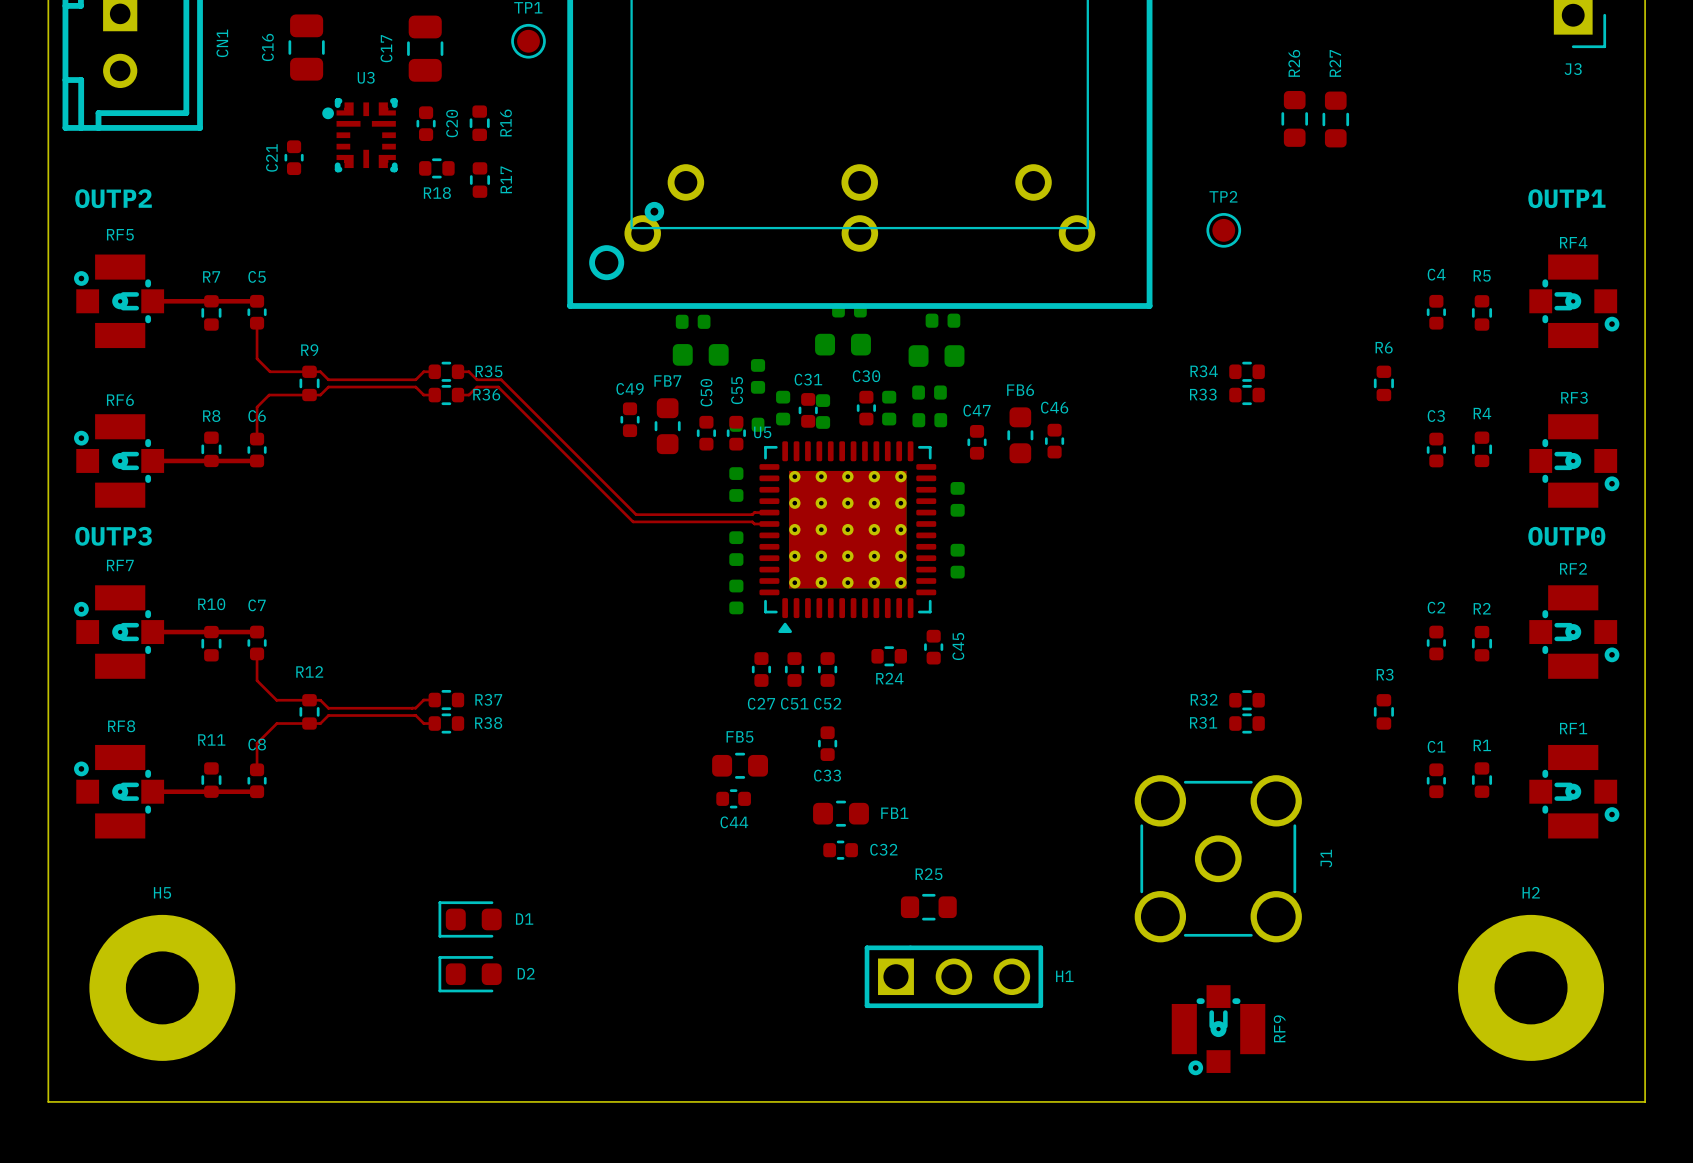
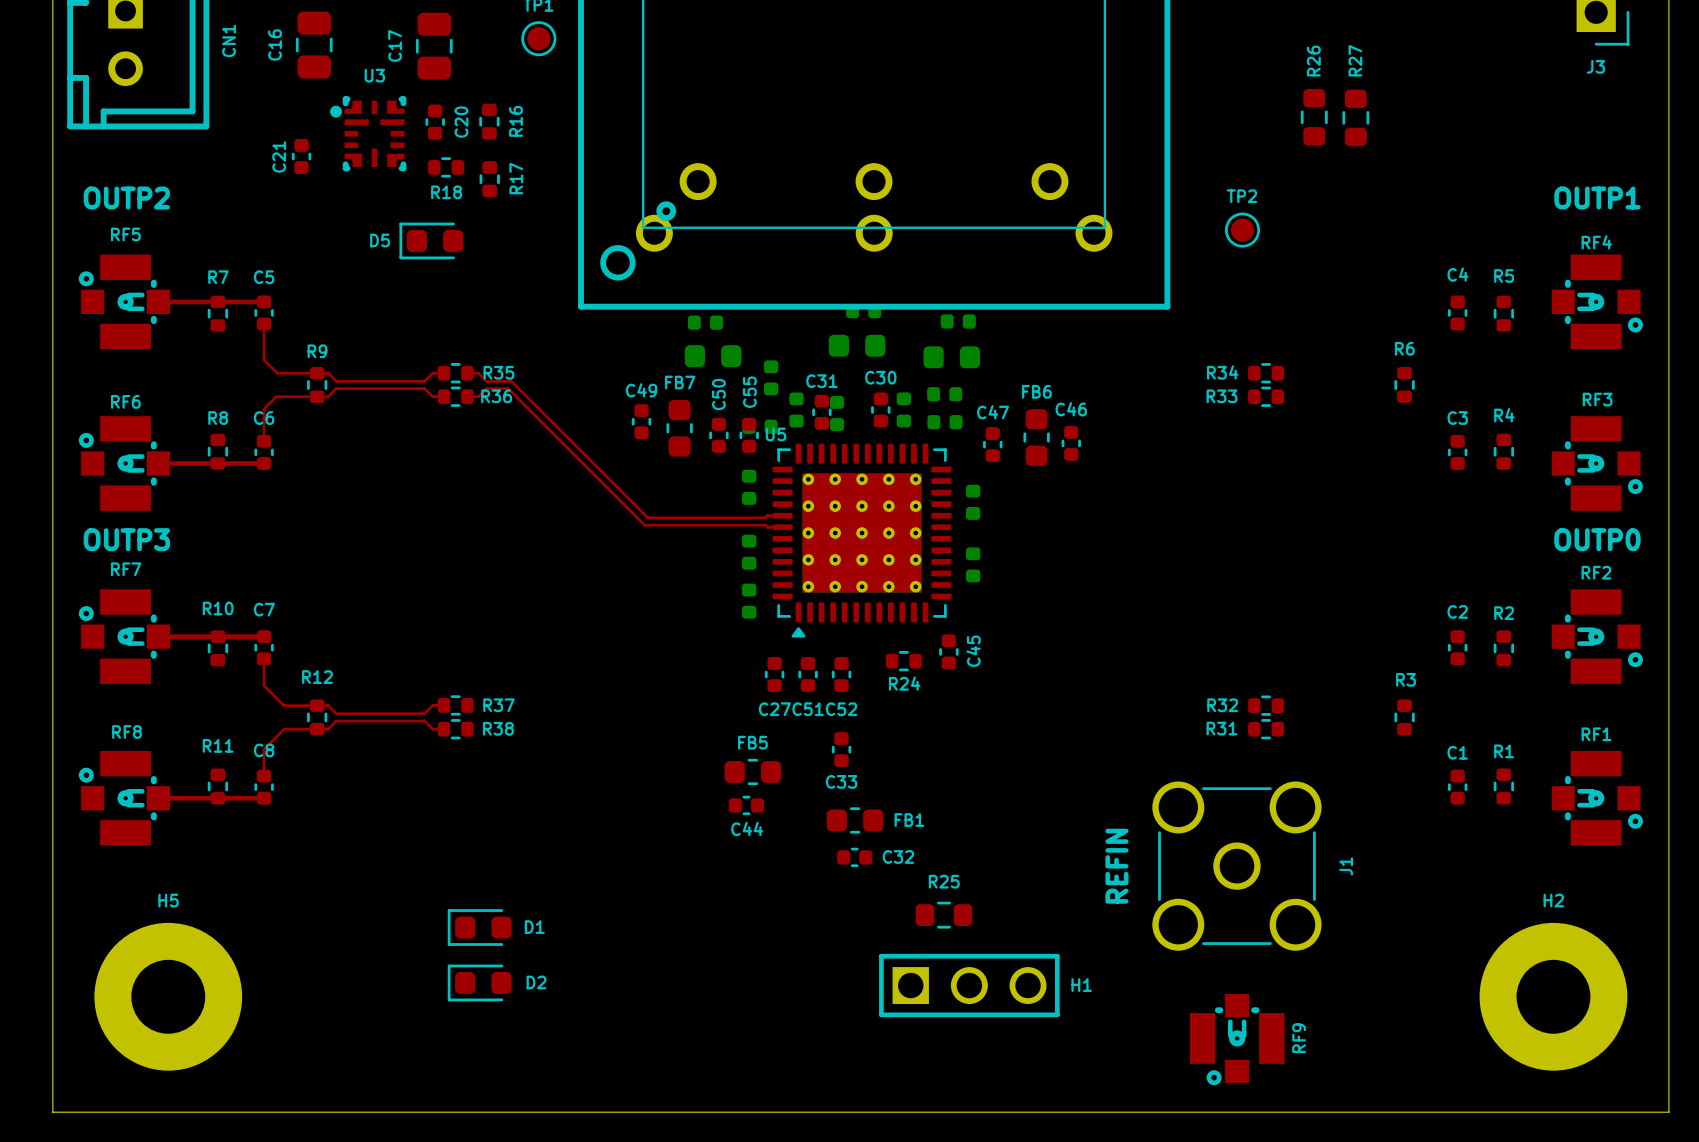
D5: none -> (431, 240)
text: none -> REFIN (1116, 866)

